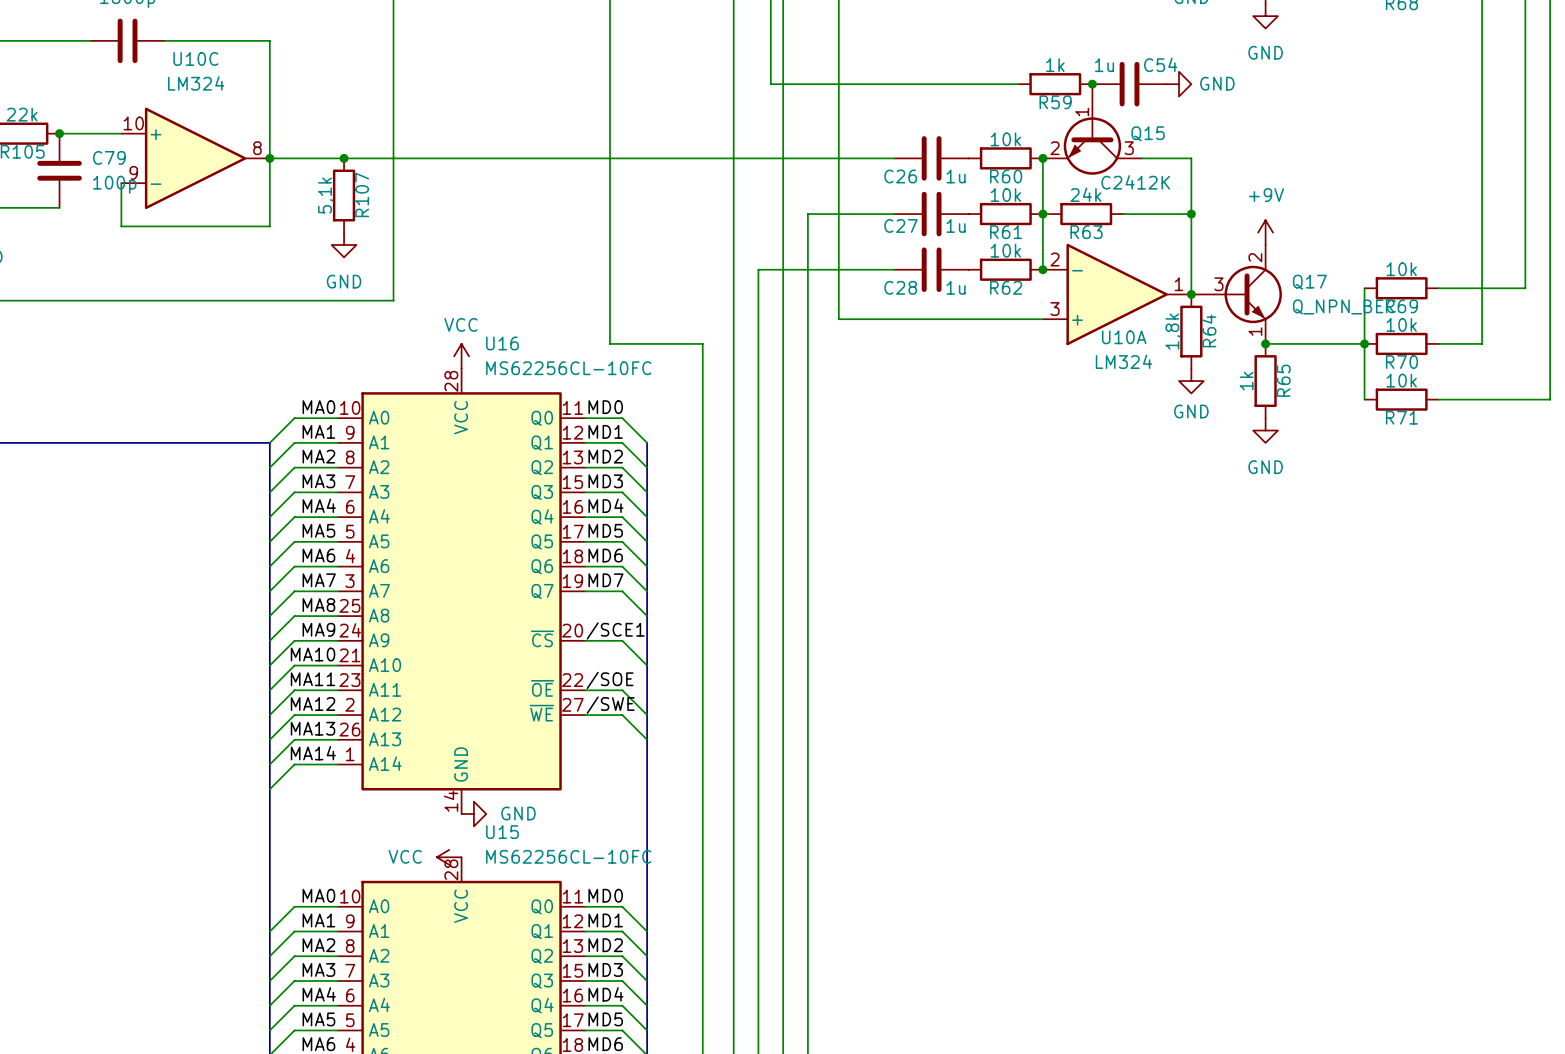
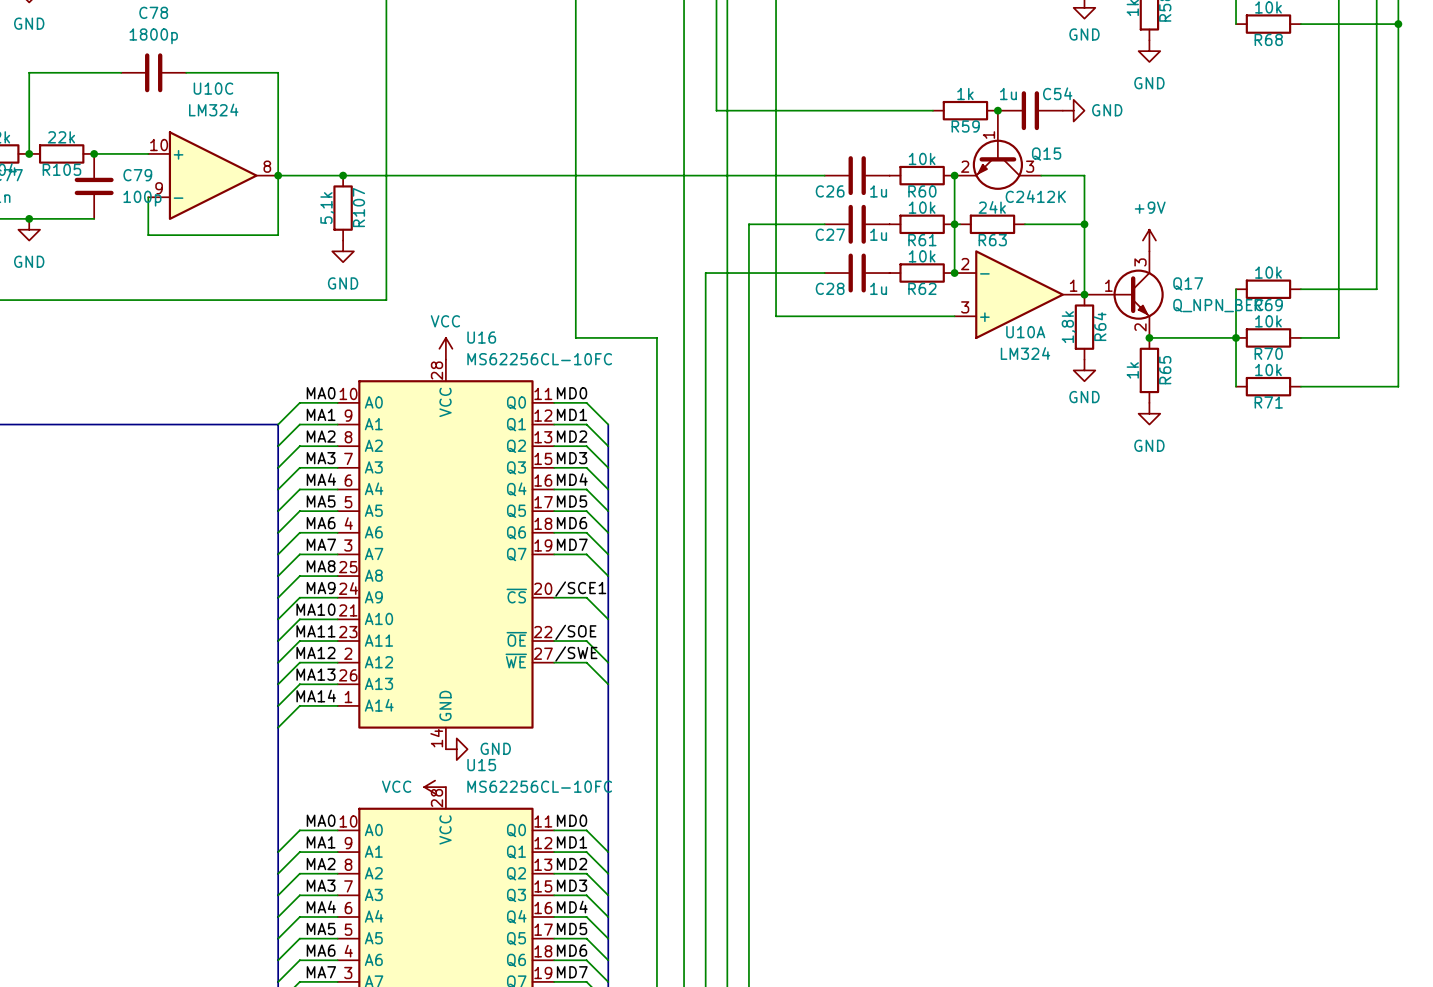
Q17 pin number: 2 (1255, 257) -> 3 (1140, 262)
Q17 pin number: 3 (1218, 284) -> 1 (1108, 285)
Q17 pin number: 1 (1255, 331) -> 2 (1140, 327)

